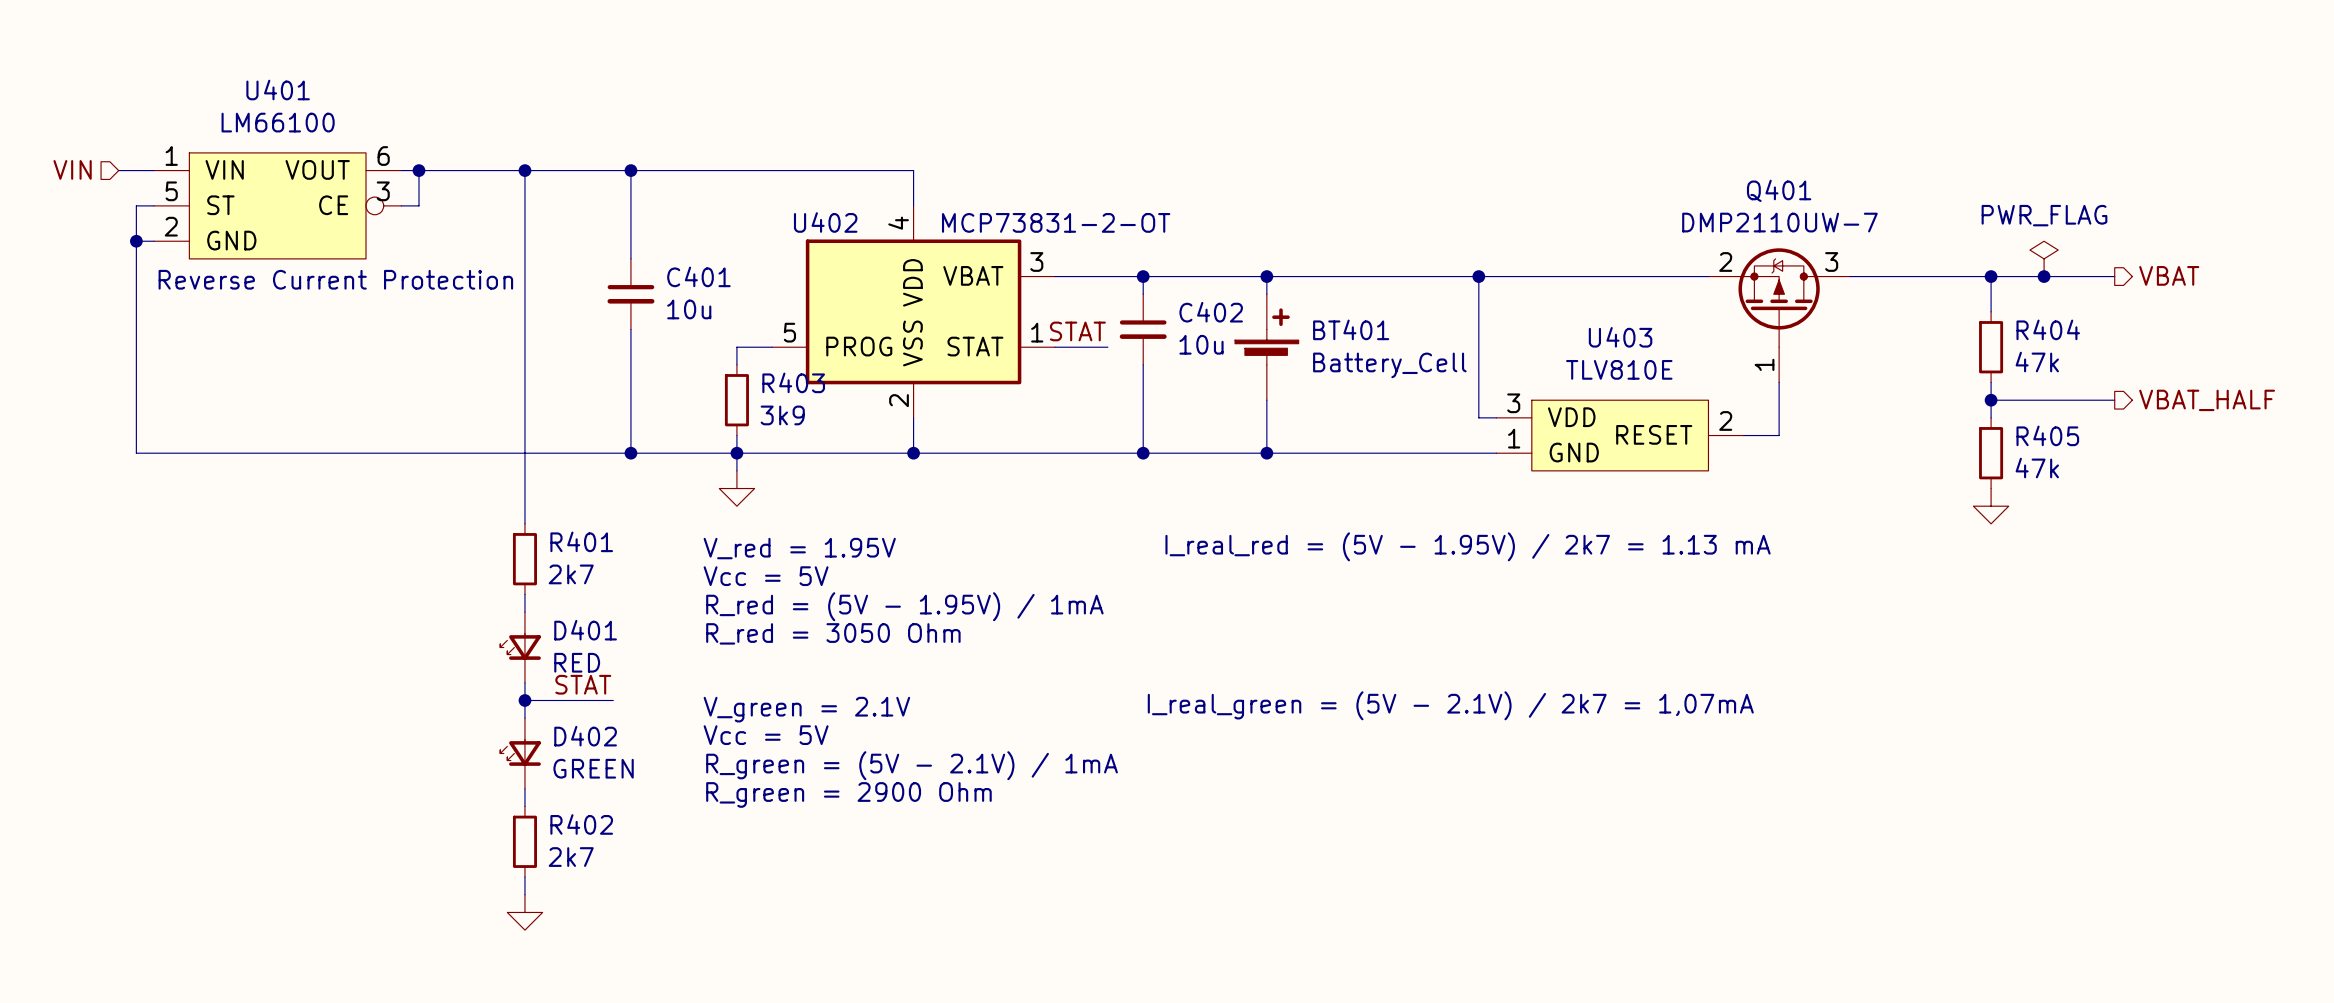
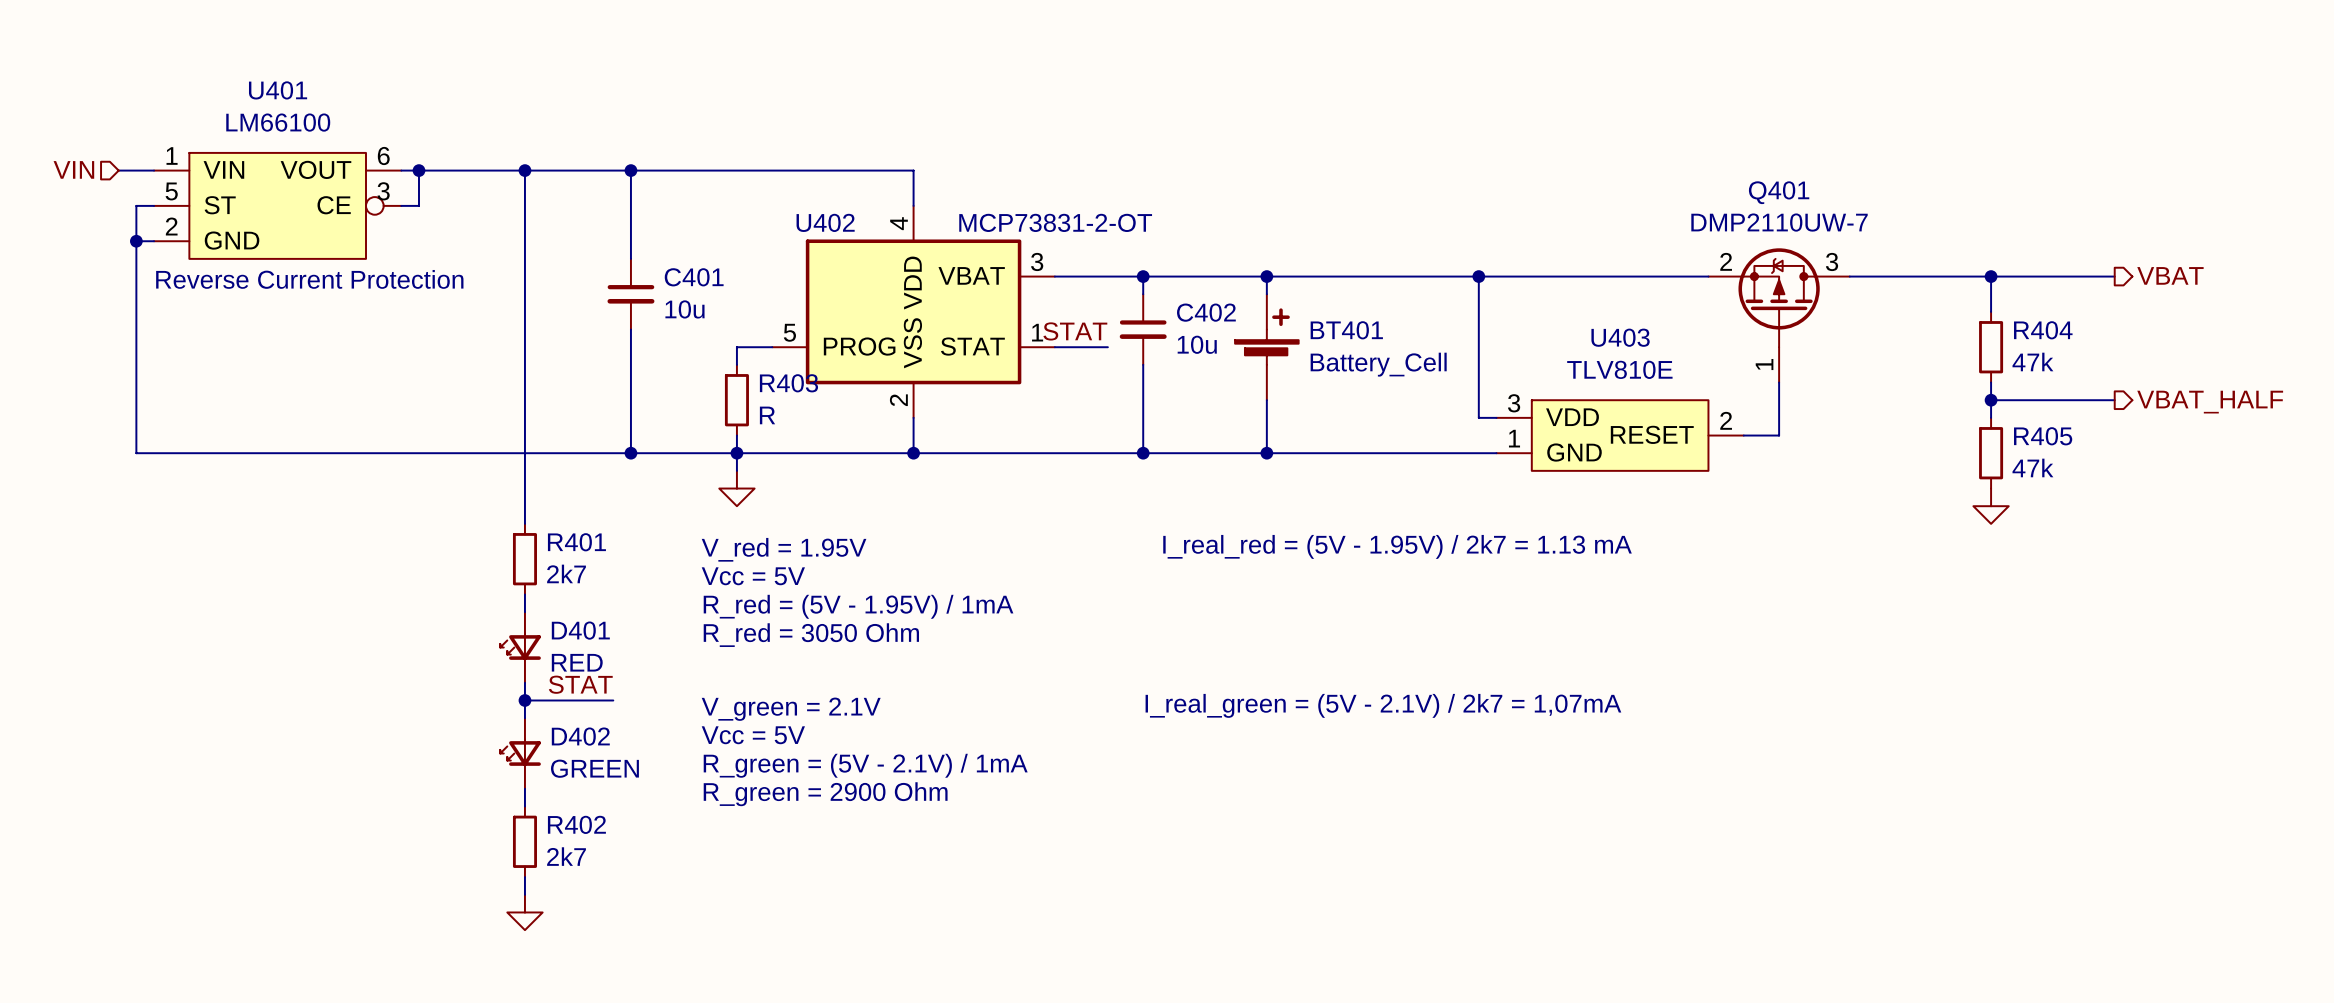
power symbol: PWR_FLAG (2044, 258) -> none
junction: (2044, 276) -> none
R403 value: 3k9 (782, 415) -> R (767, 415)

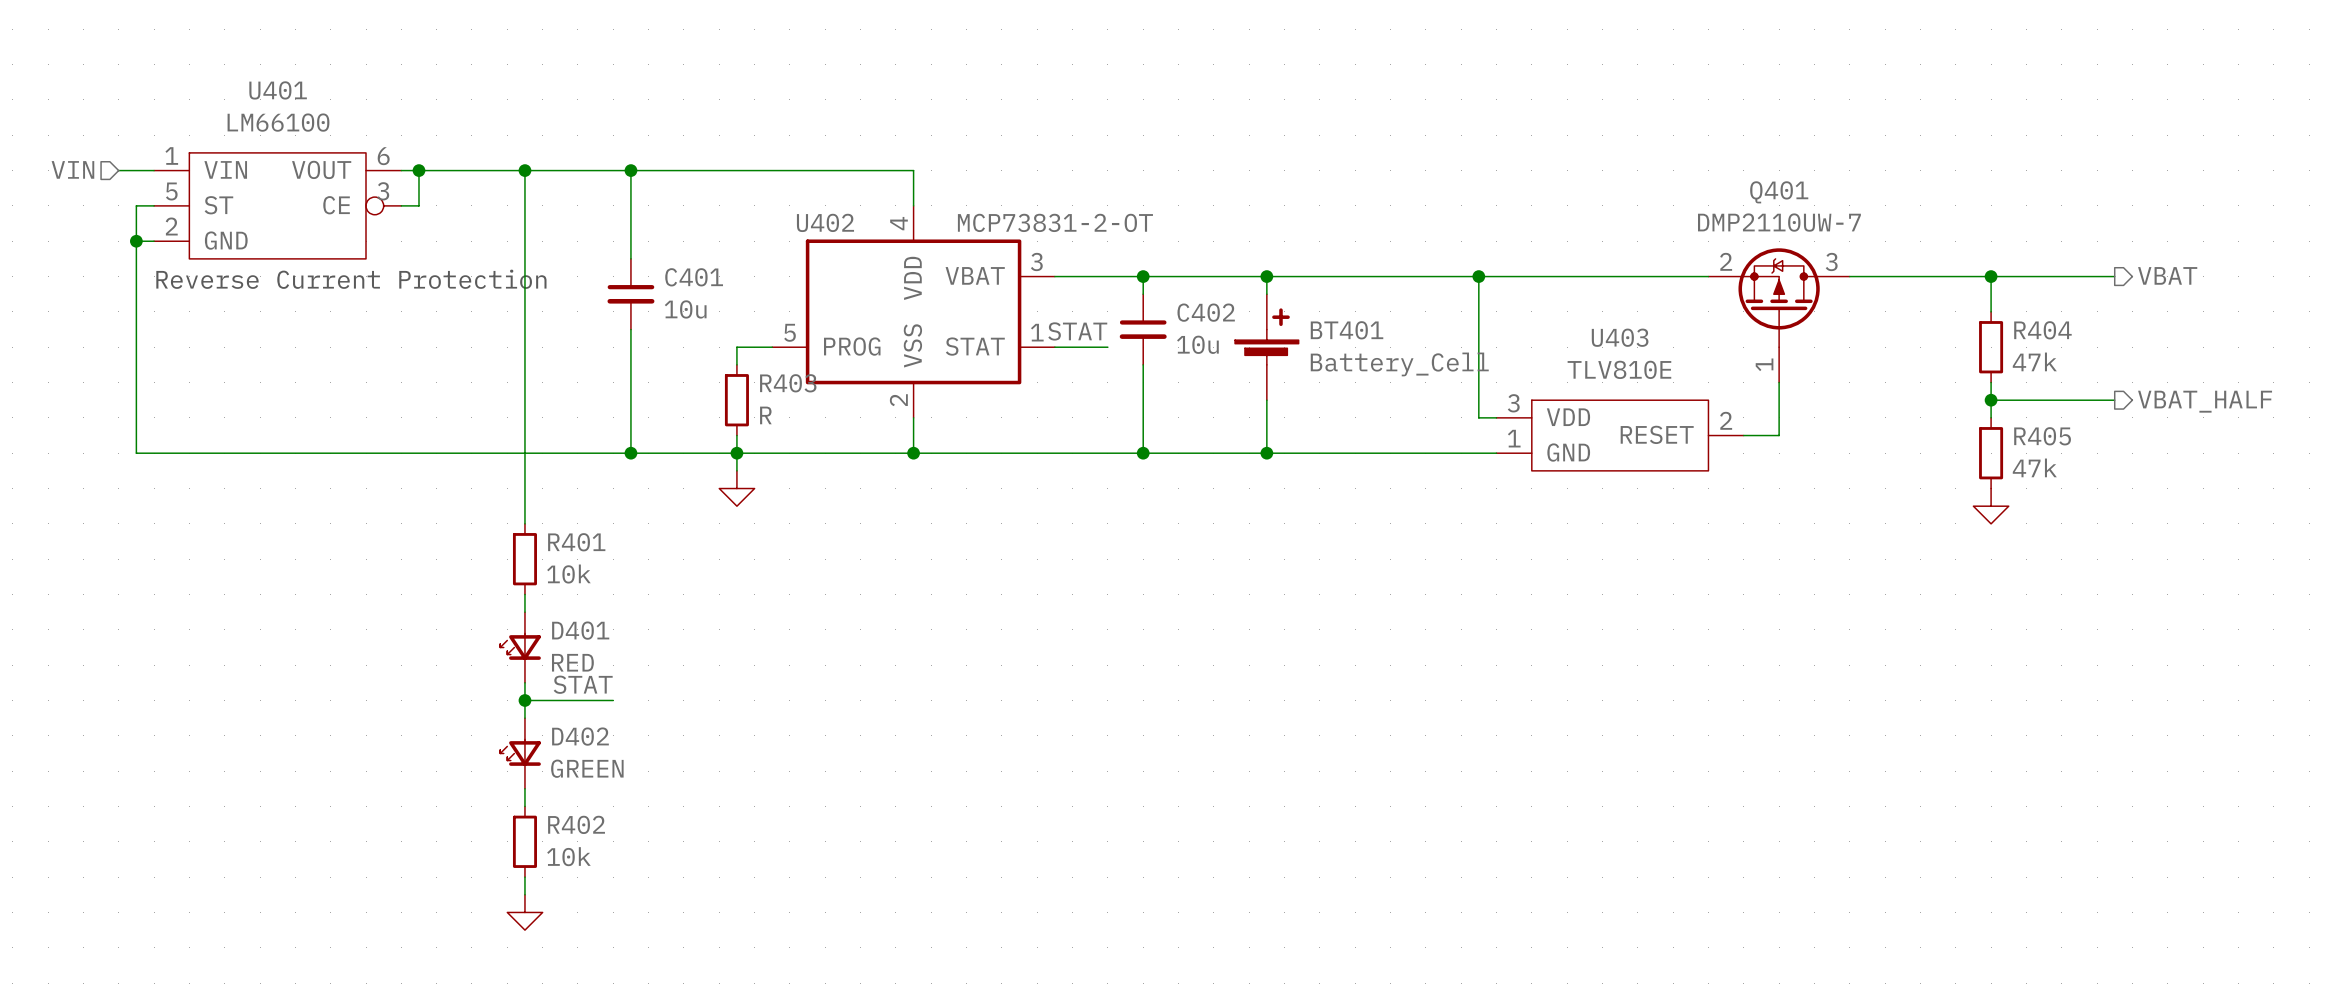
text: I_real_red = (5V - 1.95V) / 2k7 = 1.13 mA (1397, 546) -> none
text: V_red = 1.95V (784, 549) -> none
R401 value: 2k7 (566, 573) -> 10k (568, 574)
text: Vcc = 5V (753, 576) -> none
text: R_red = (5V - 1.95V) / 1mA (858, 606) -> none
text: R_red = 3050 Ohm (811, 635) -> none
text: I_real_green = (5V - 2.1V) / 2k7 = 1,07mA (1383, 705) -> none
text: V_green = 2.1V (791, 709) -> none
text: Vcc = 5V (753, 735) -> none
text: R_green = (5V - 2.1V) / 1mA (865, 765) -> none
text: R_green = 2900 Ohm (825, 794) -> none
R402 value: 2k7 (566, 856) -> 10k (568, 856)

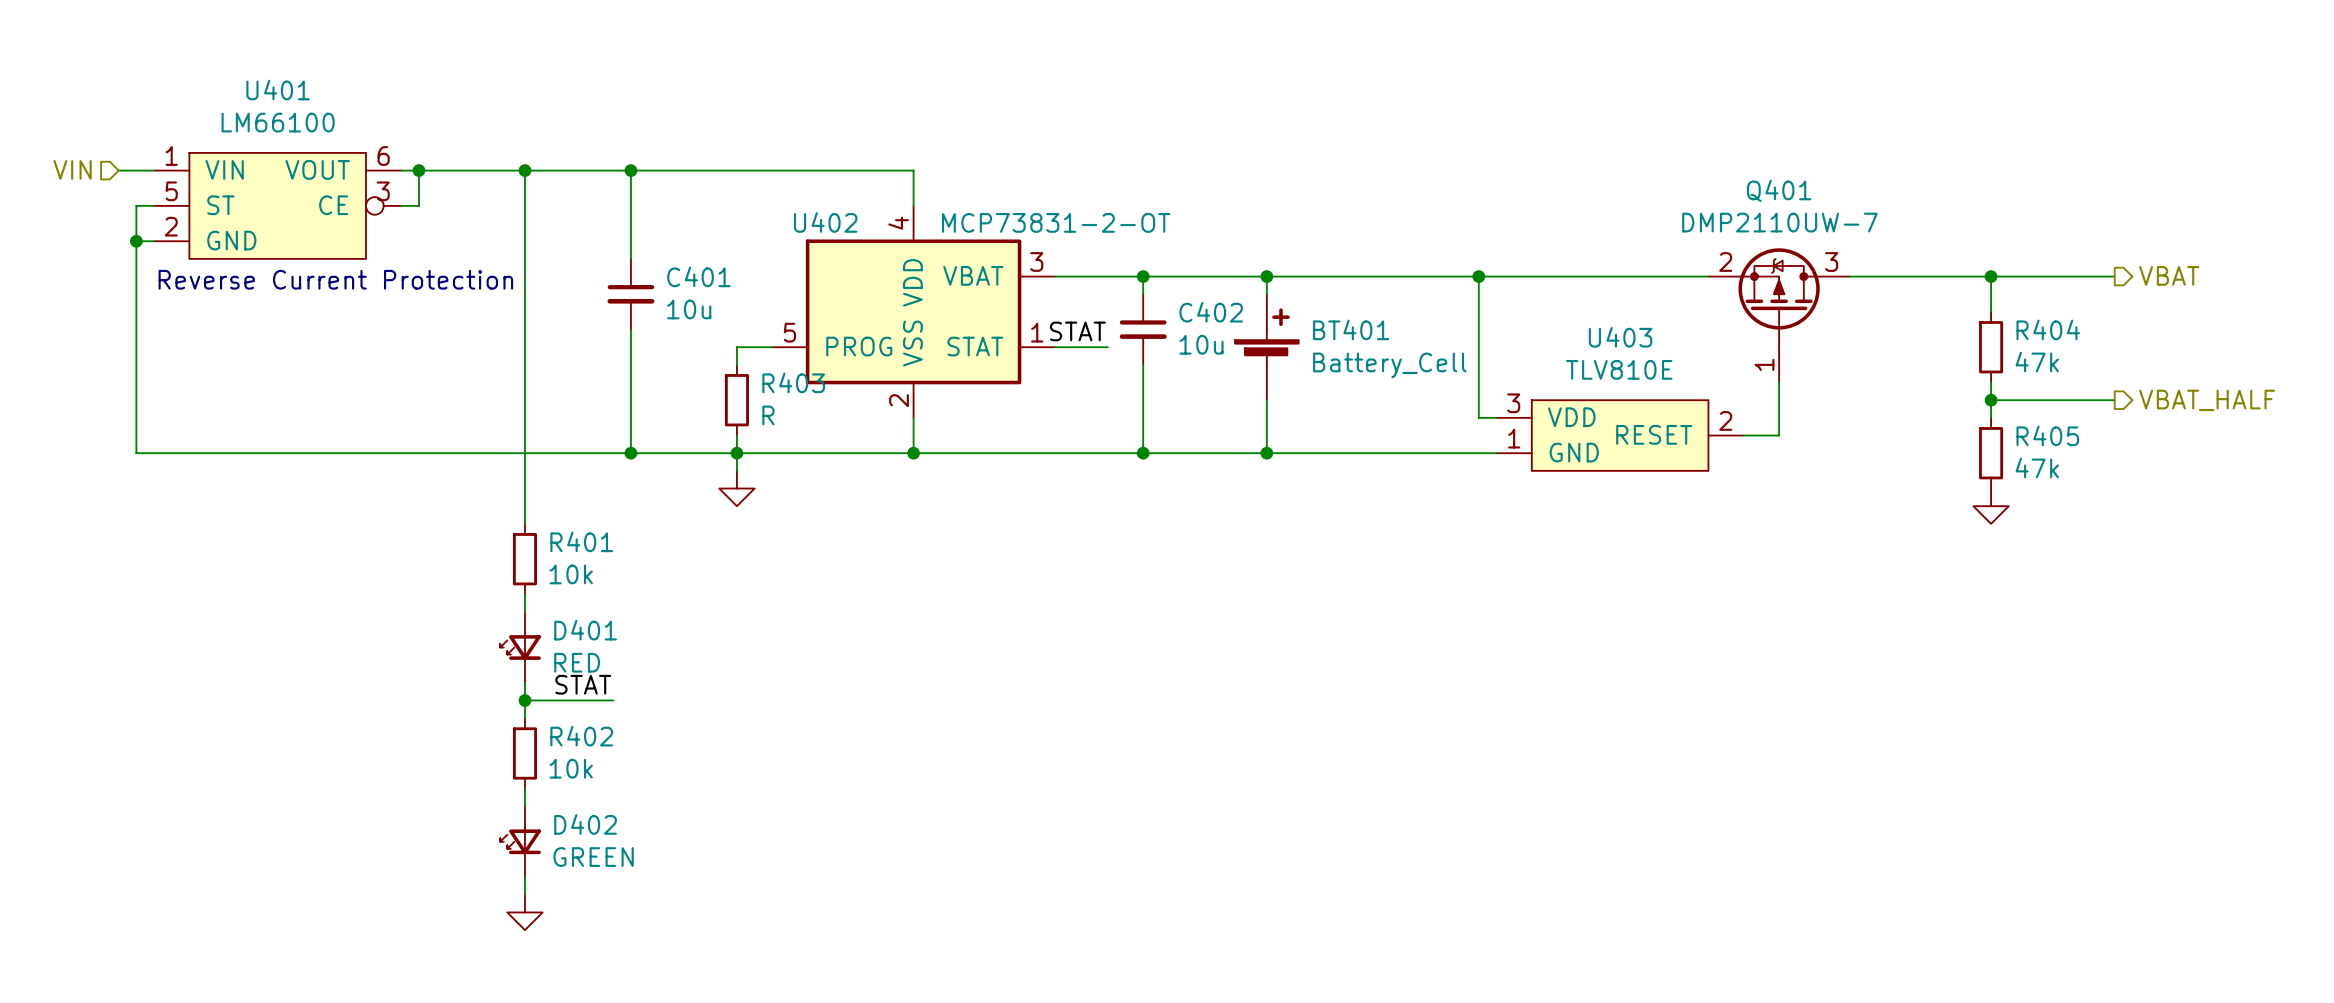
D402 position: (520, 753) -> (520, 841)
R402 position: (524, 841) -> (524, 753)

